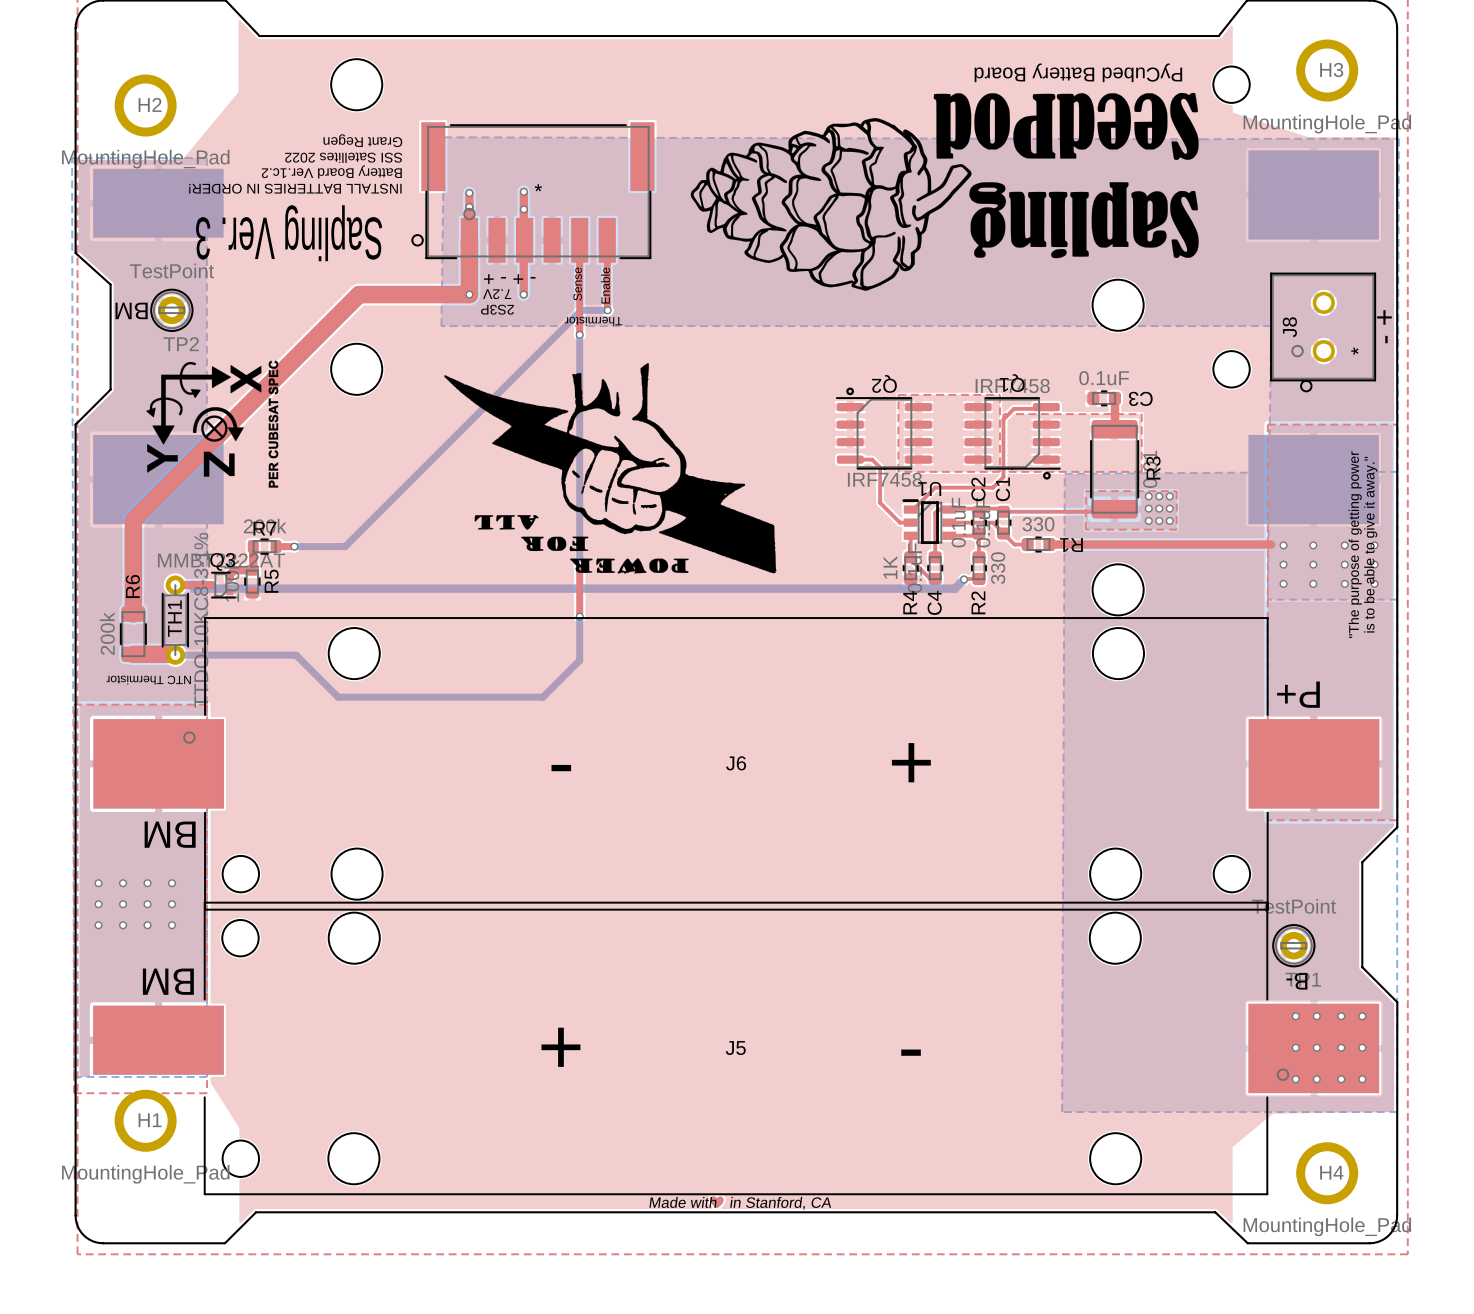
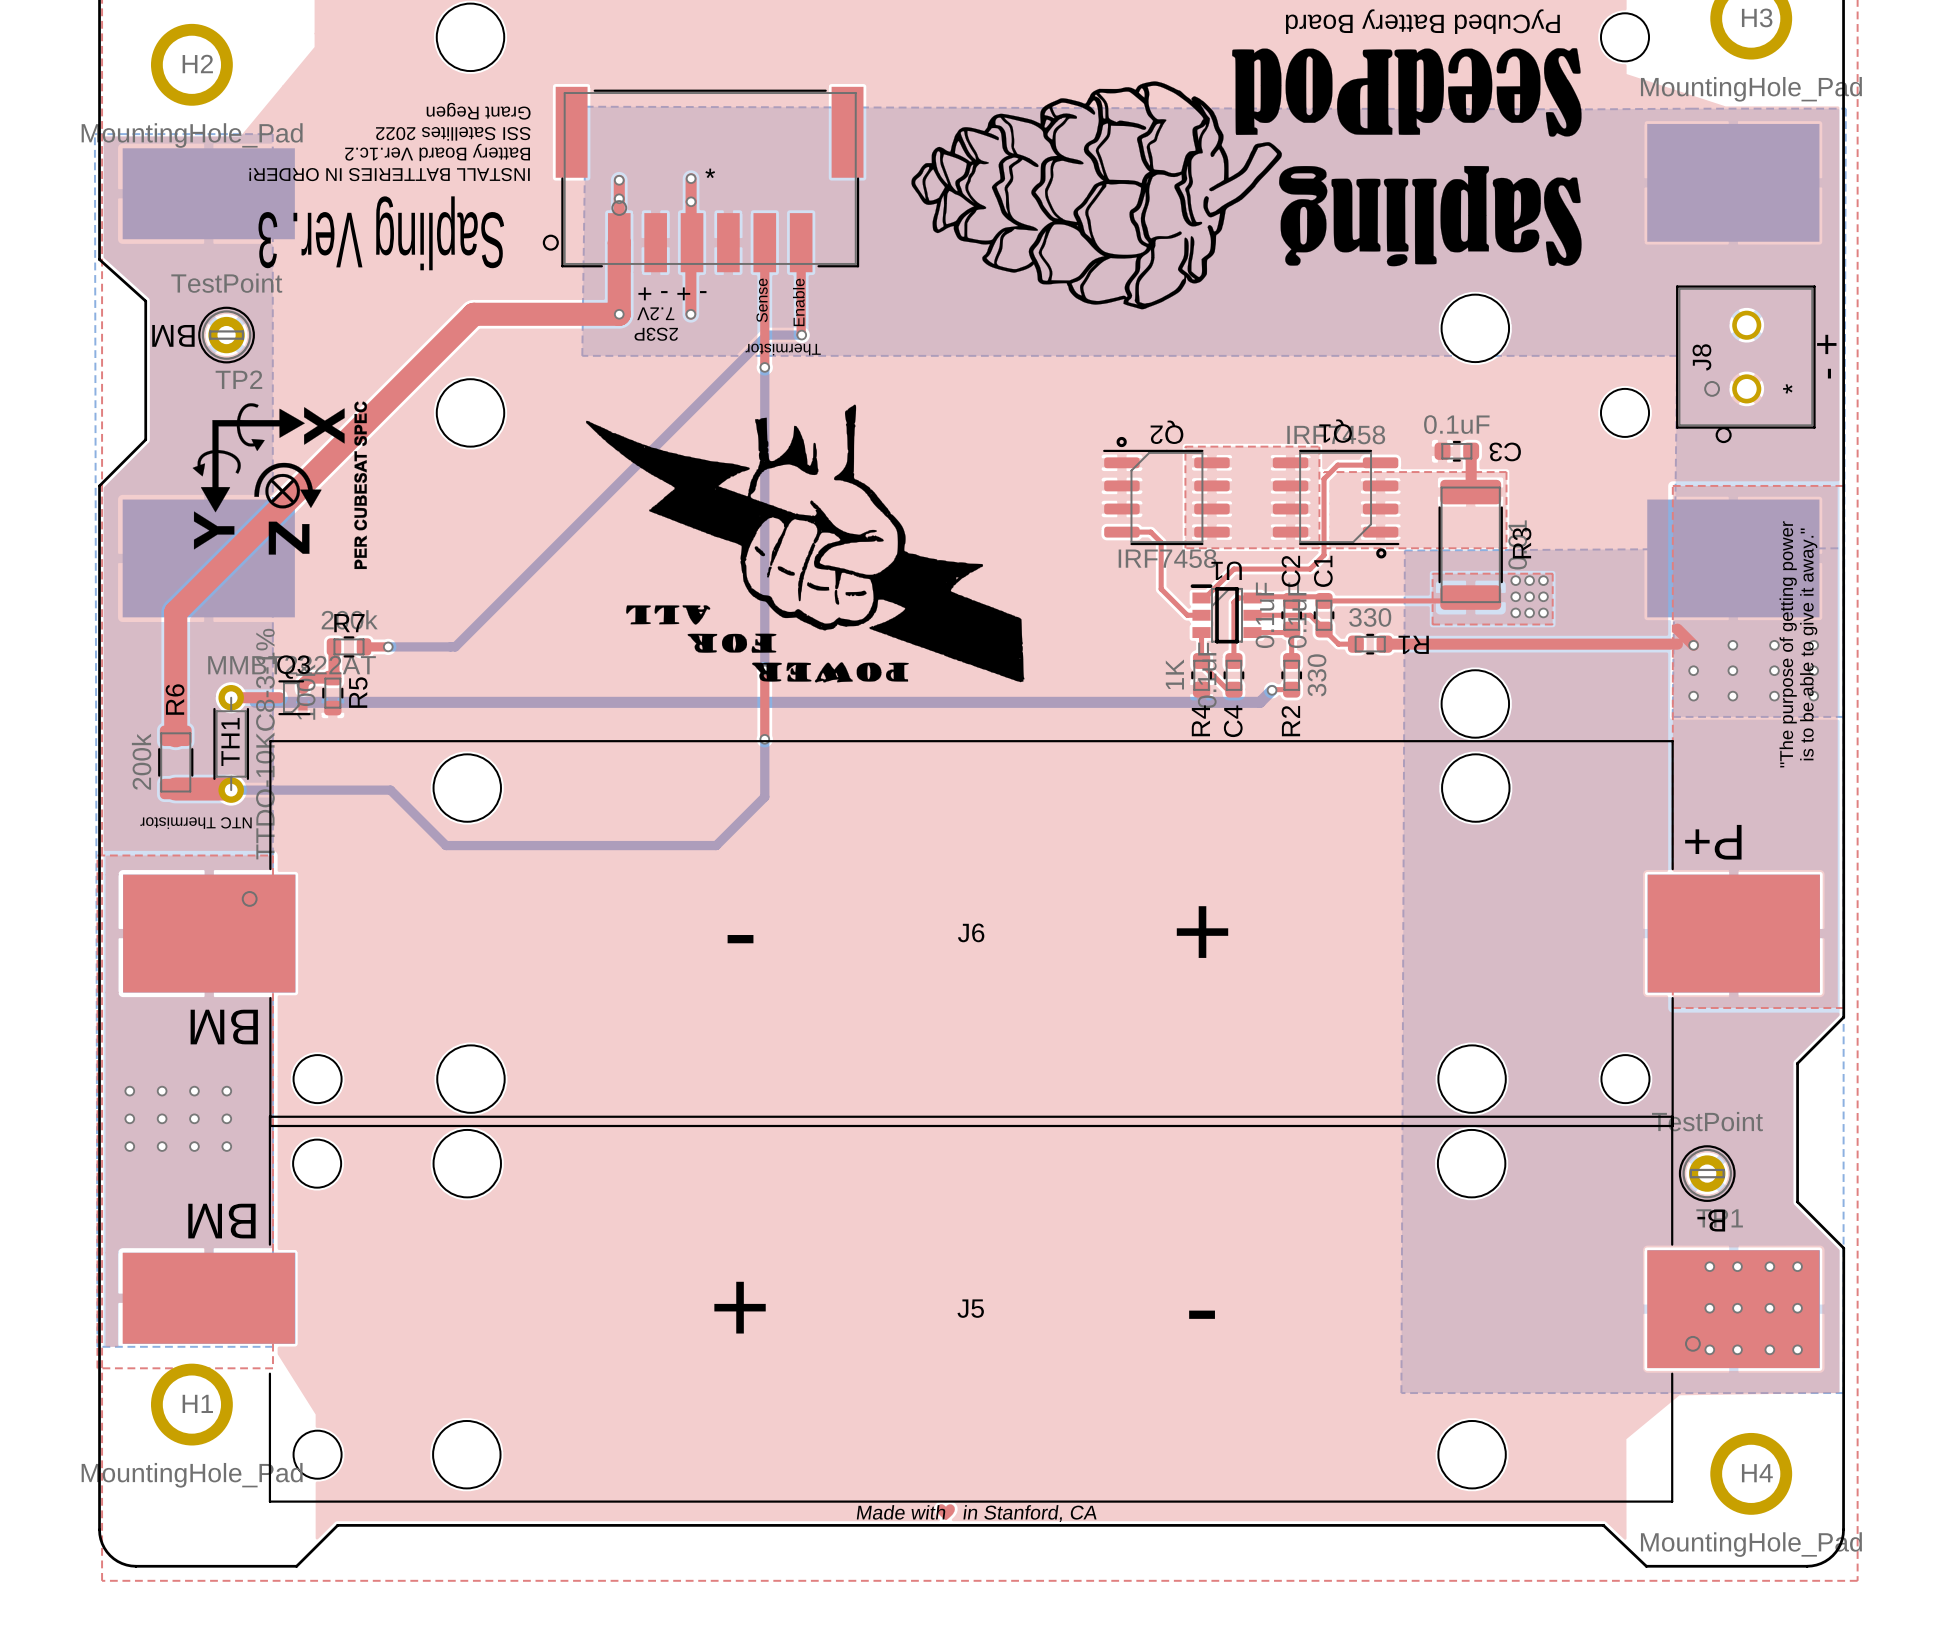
top track: none -> (1677, 629) (1693, 645)

